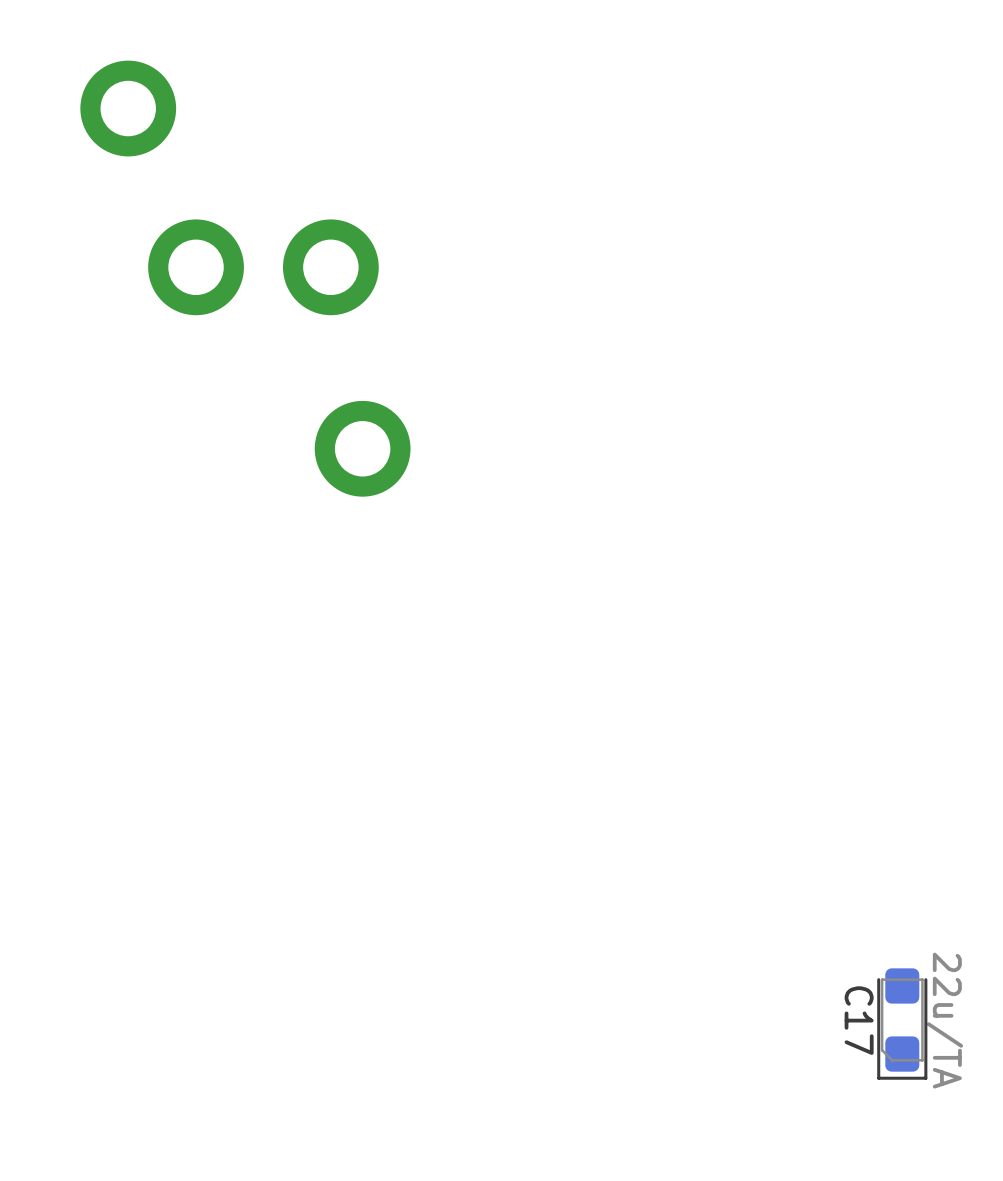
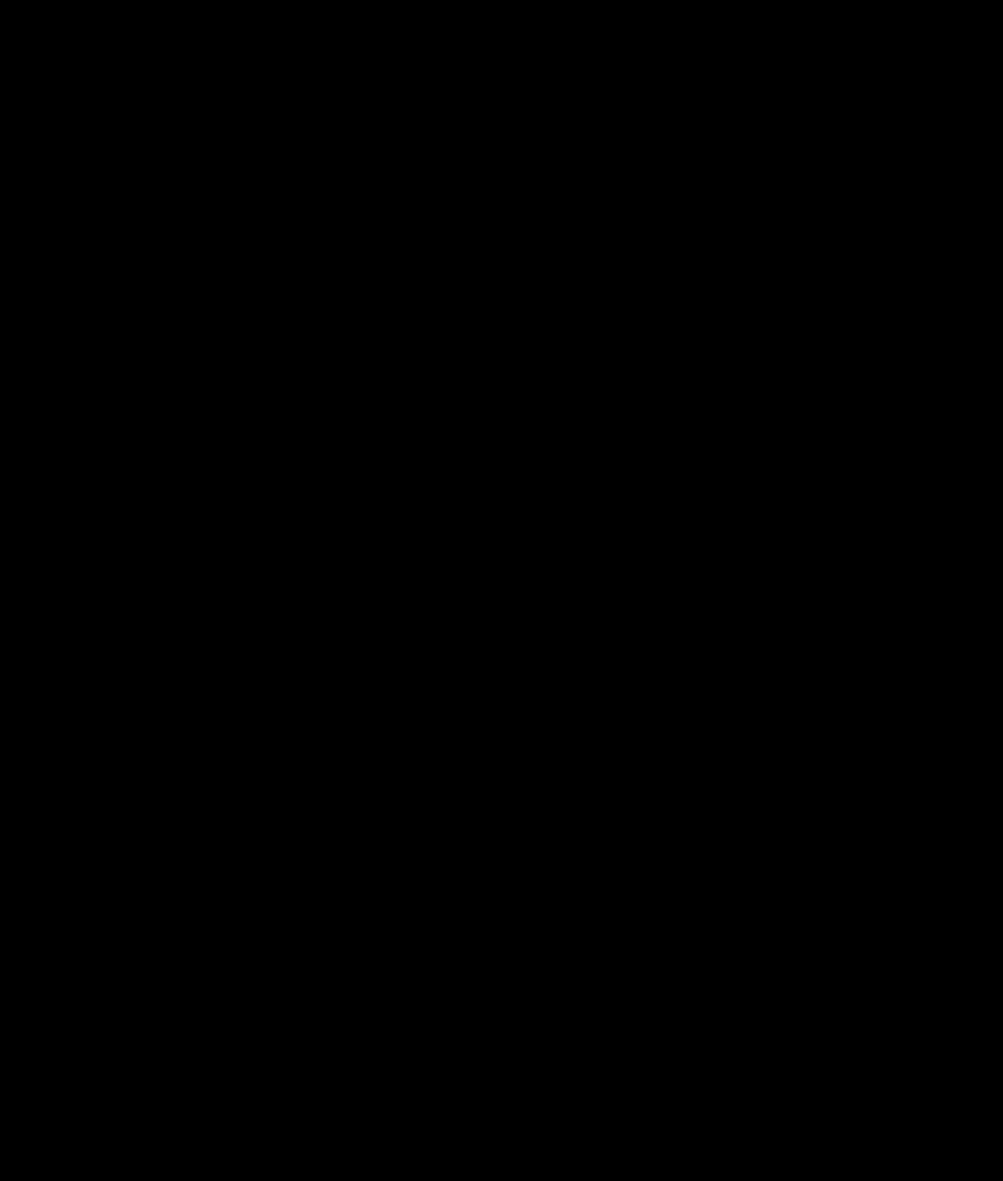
part: (128, 108) -> none
part: (196, 267) -> none
part: (330, 267) -> none
part: (362, 448) -> none
C17: 22u/TA (902, 1024) -> none

